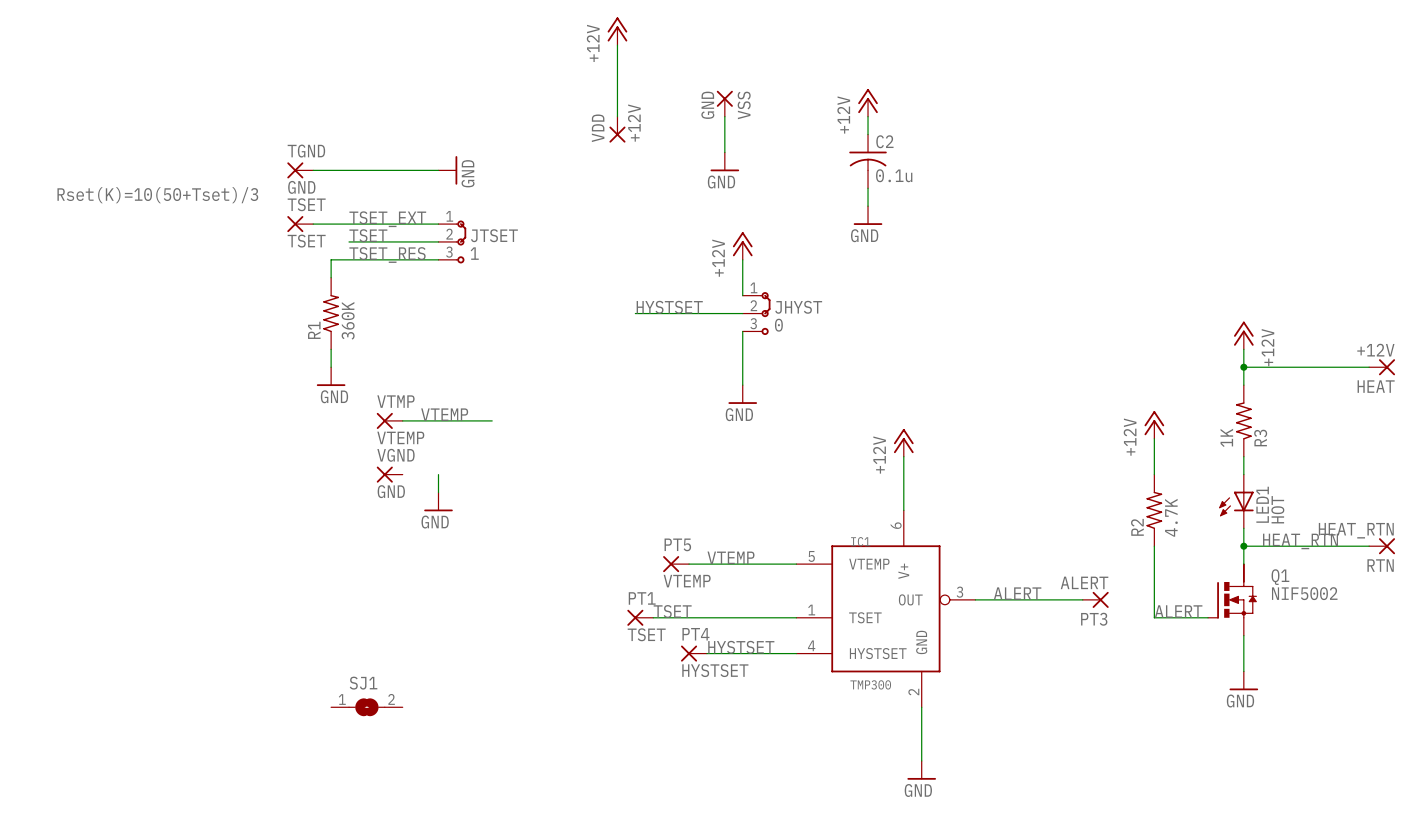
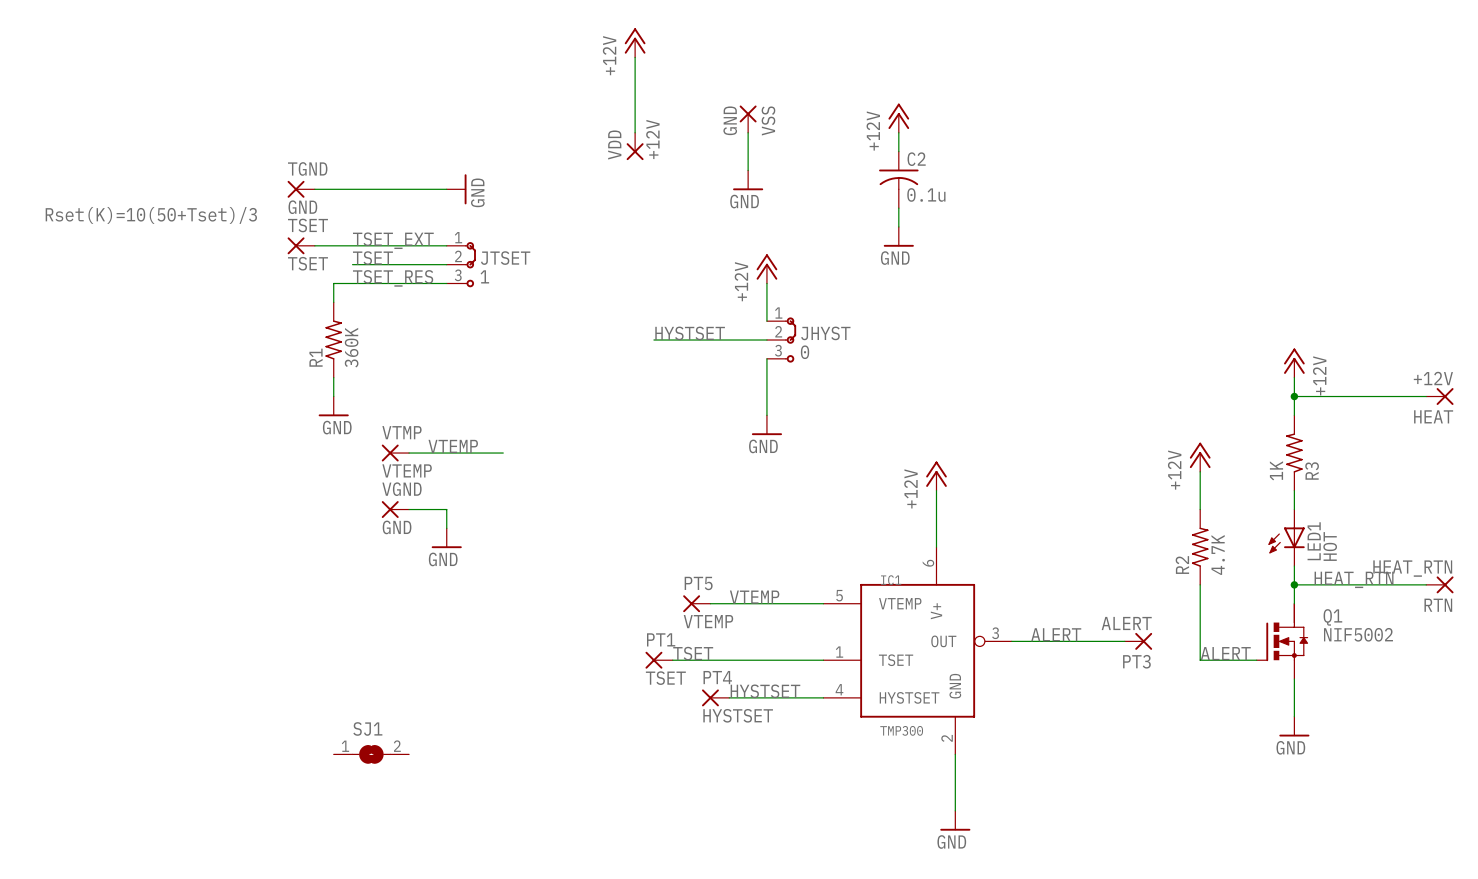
wire: none -> (409, 509) (446, 509)

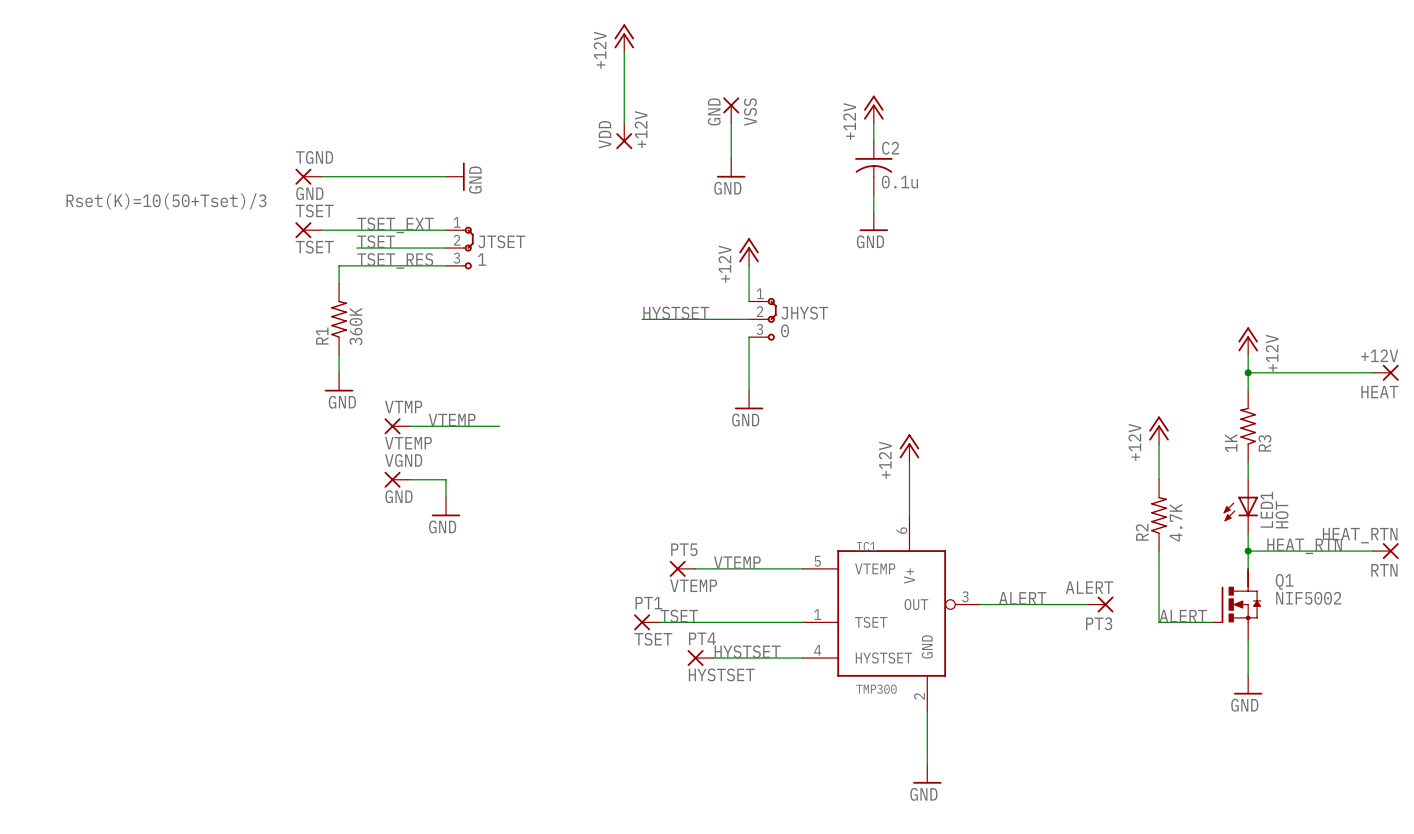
SJ1: (371, 754) -> none

